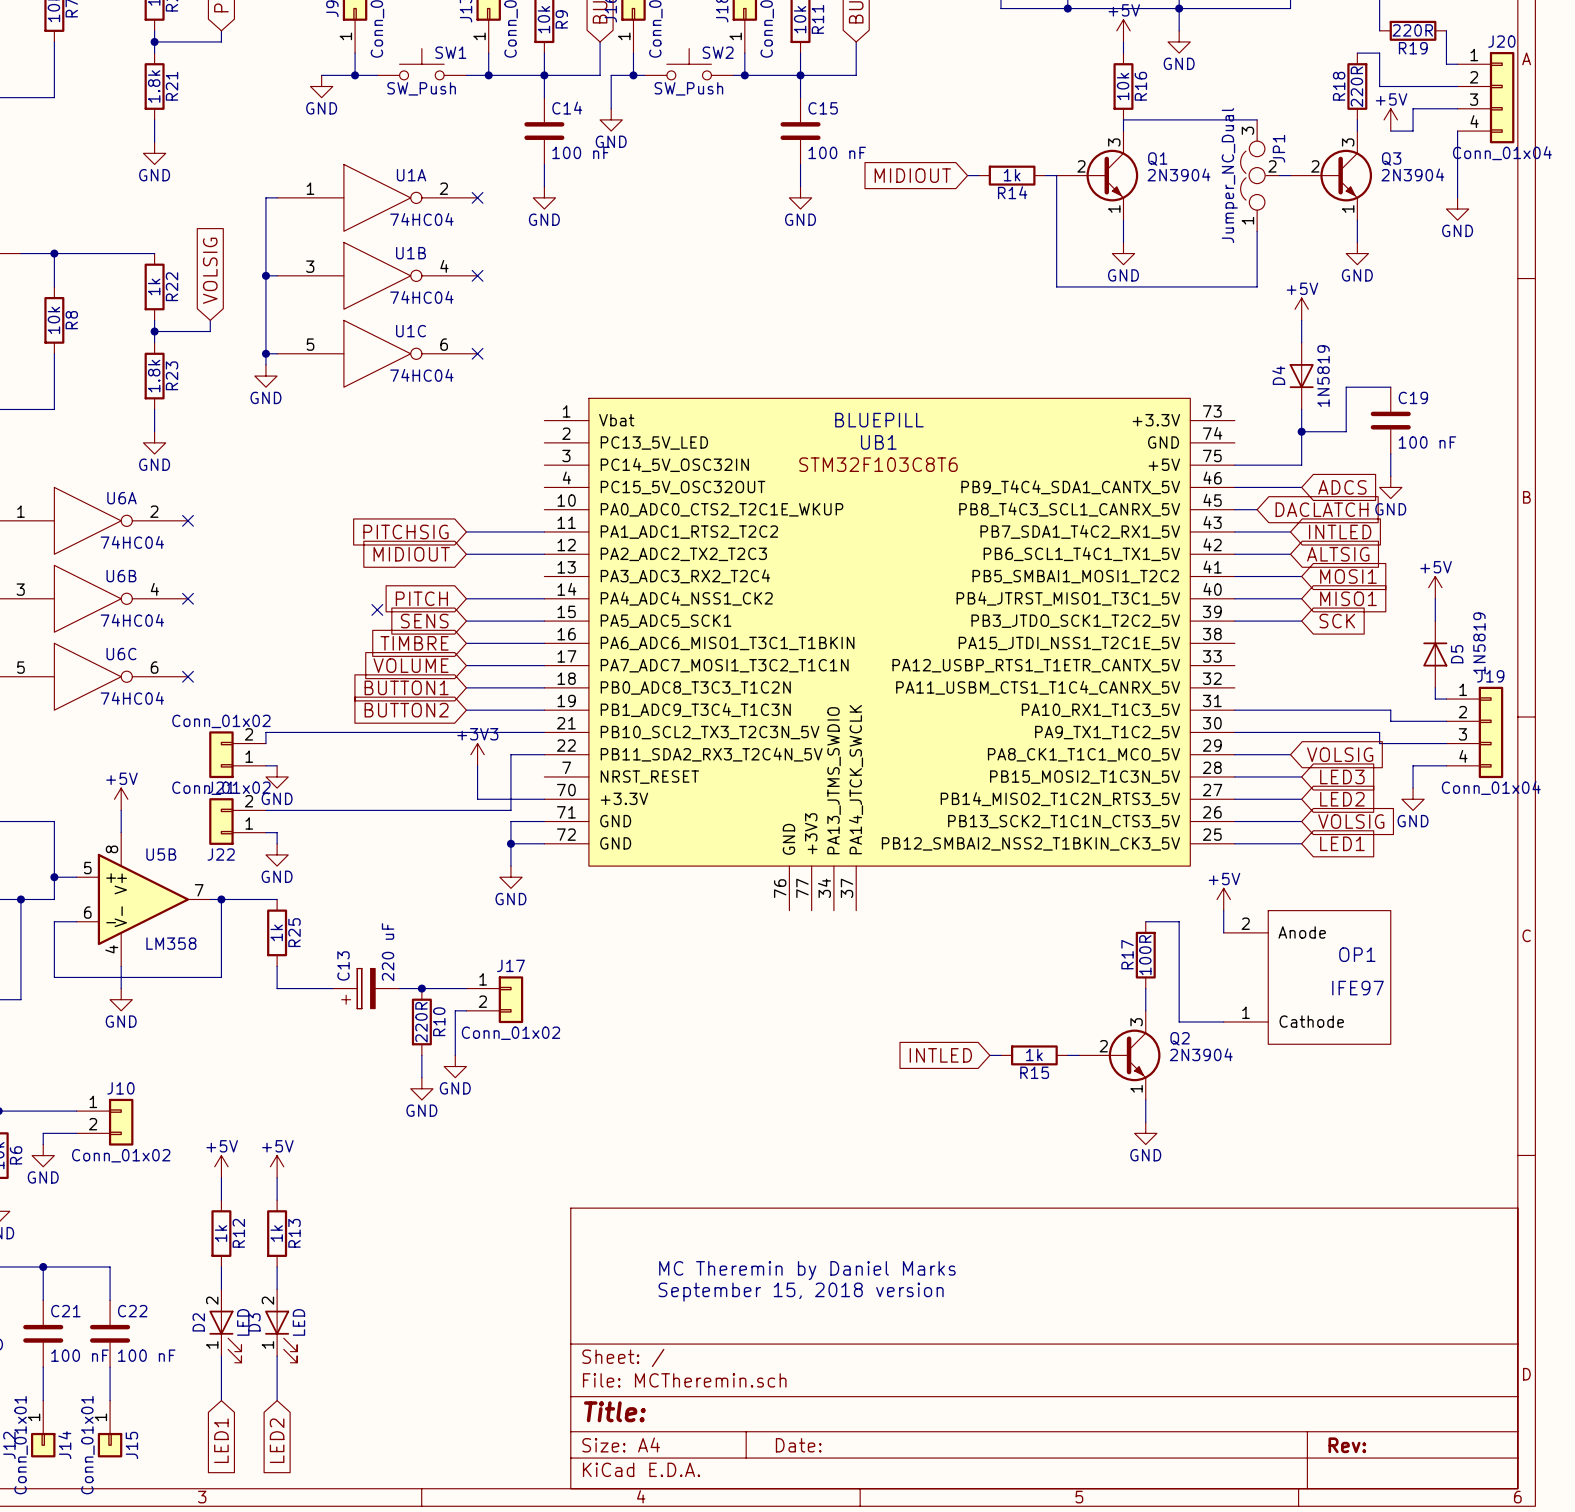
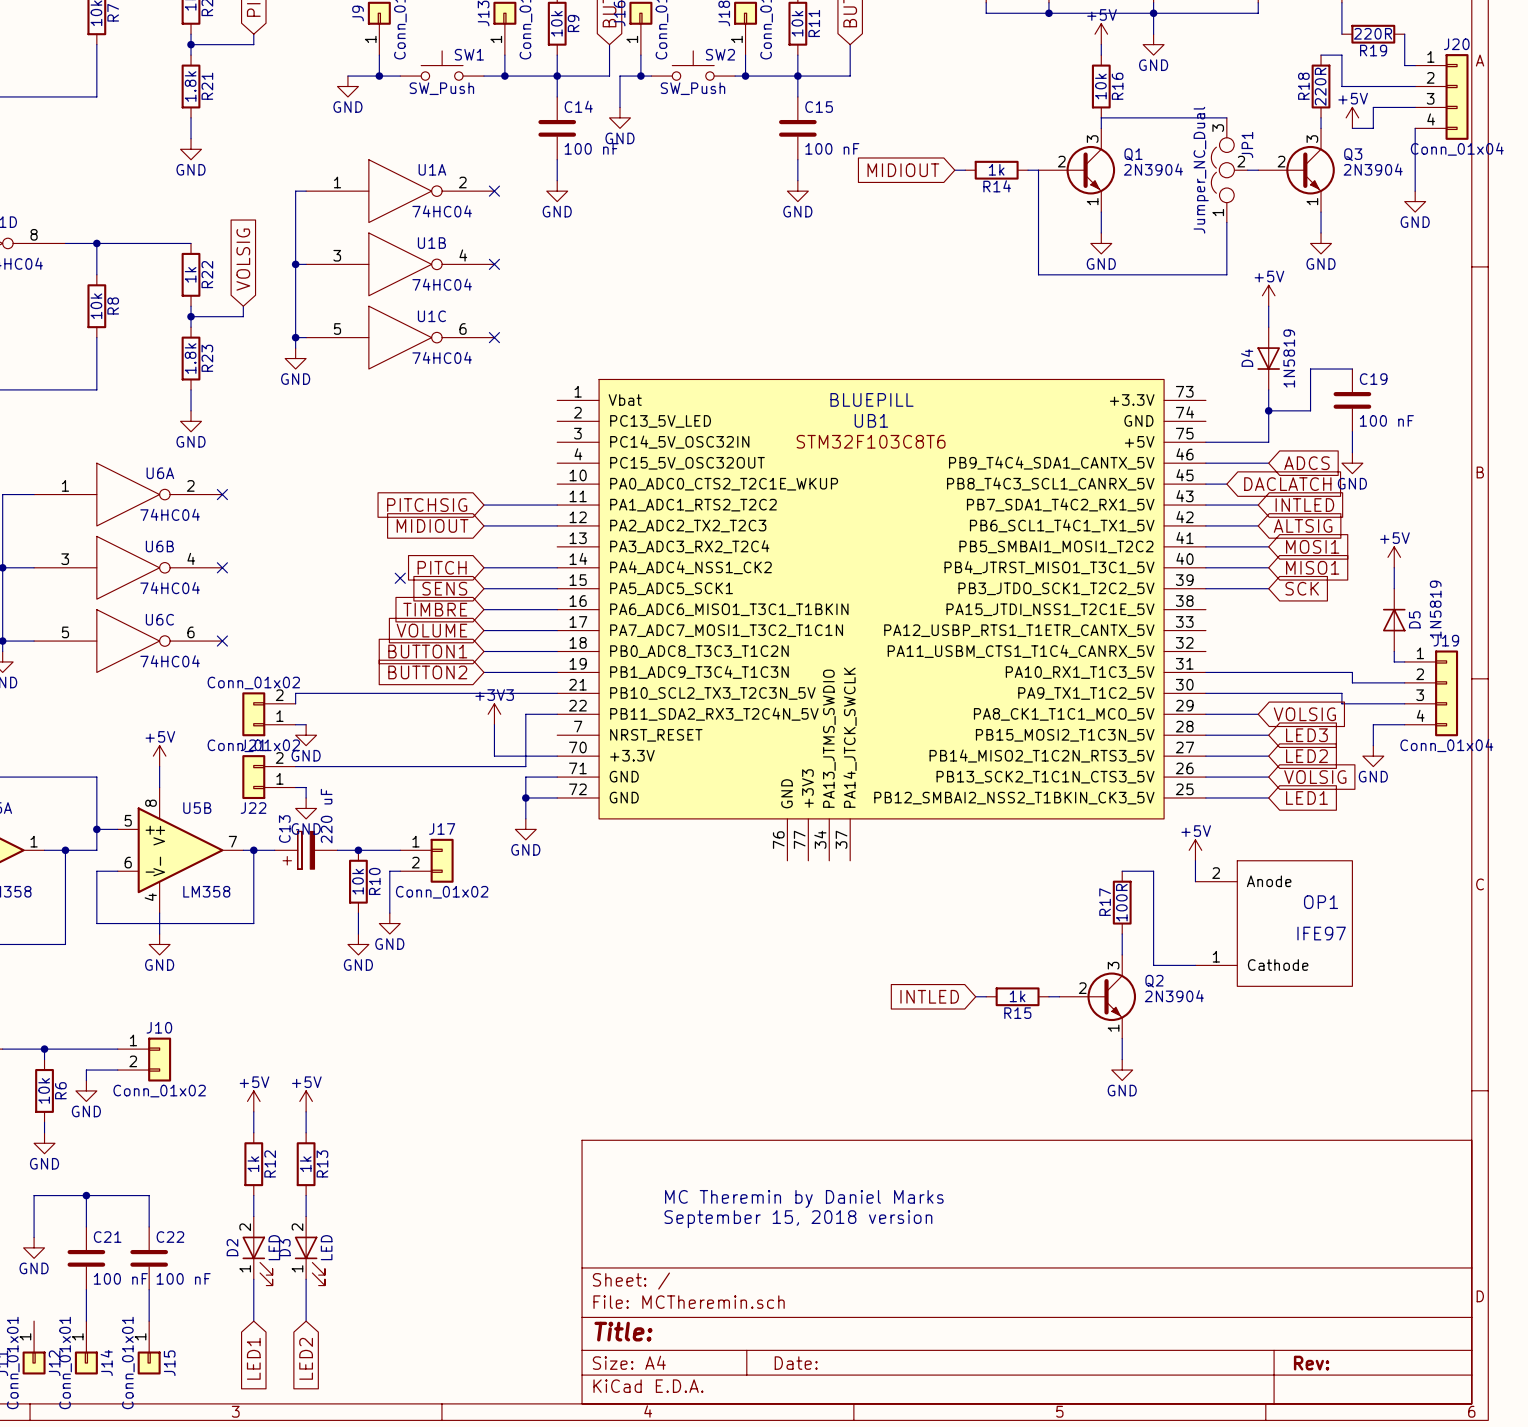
junction: none -> (358, 850)
R25: 1k (277, 932) -> none
wire: (277, 966) (277, 988) (332, 988) -> (358, 913) (358, 934)
power symbol: none -> GND (389, 923)
C13 position: (366, 988) -> (306, 850)
wire: (399, 988) (466, 988) -> (337, 850) (400, 850)
junction: (421, 988) -> none
power symbol: none -> GND (358, 944)
J17 position: (494, 999) -> (426, 860)
wire: (466, 1010) (455, 1010) (455, 1055) -> (400, 871) (389, 871) (389, 913)
R10 position: (421, 1021) -> (358, 881)
R10 value: 220R (421, 1022) -> 10k (358, 881)
wire: (421, 1055) (421, 1077) -> none
power symbol: GND (455, 1066) -> none
power symbol: GND (421, 1088) -> none

